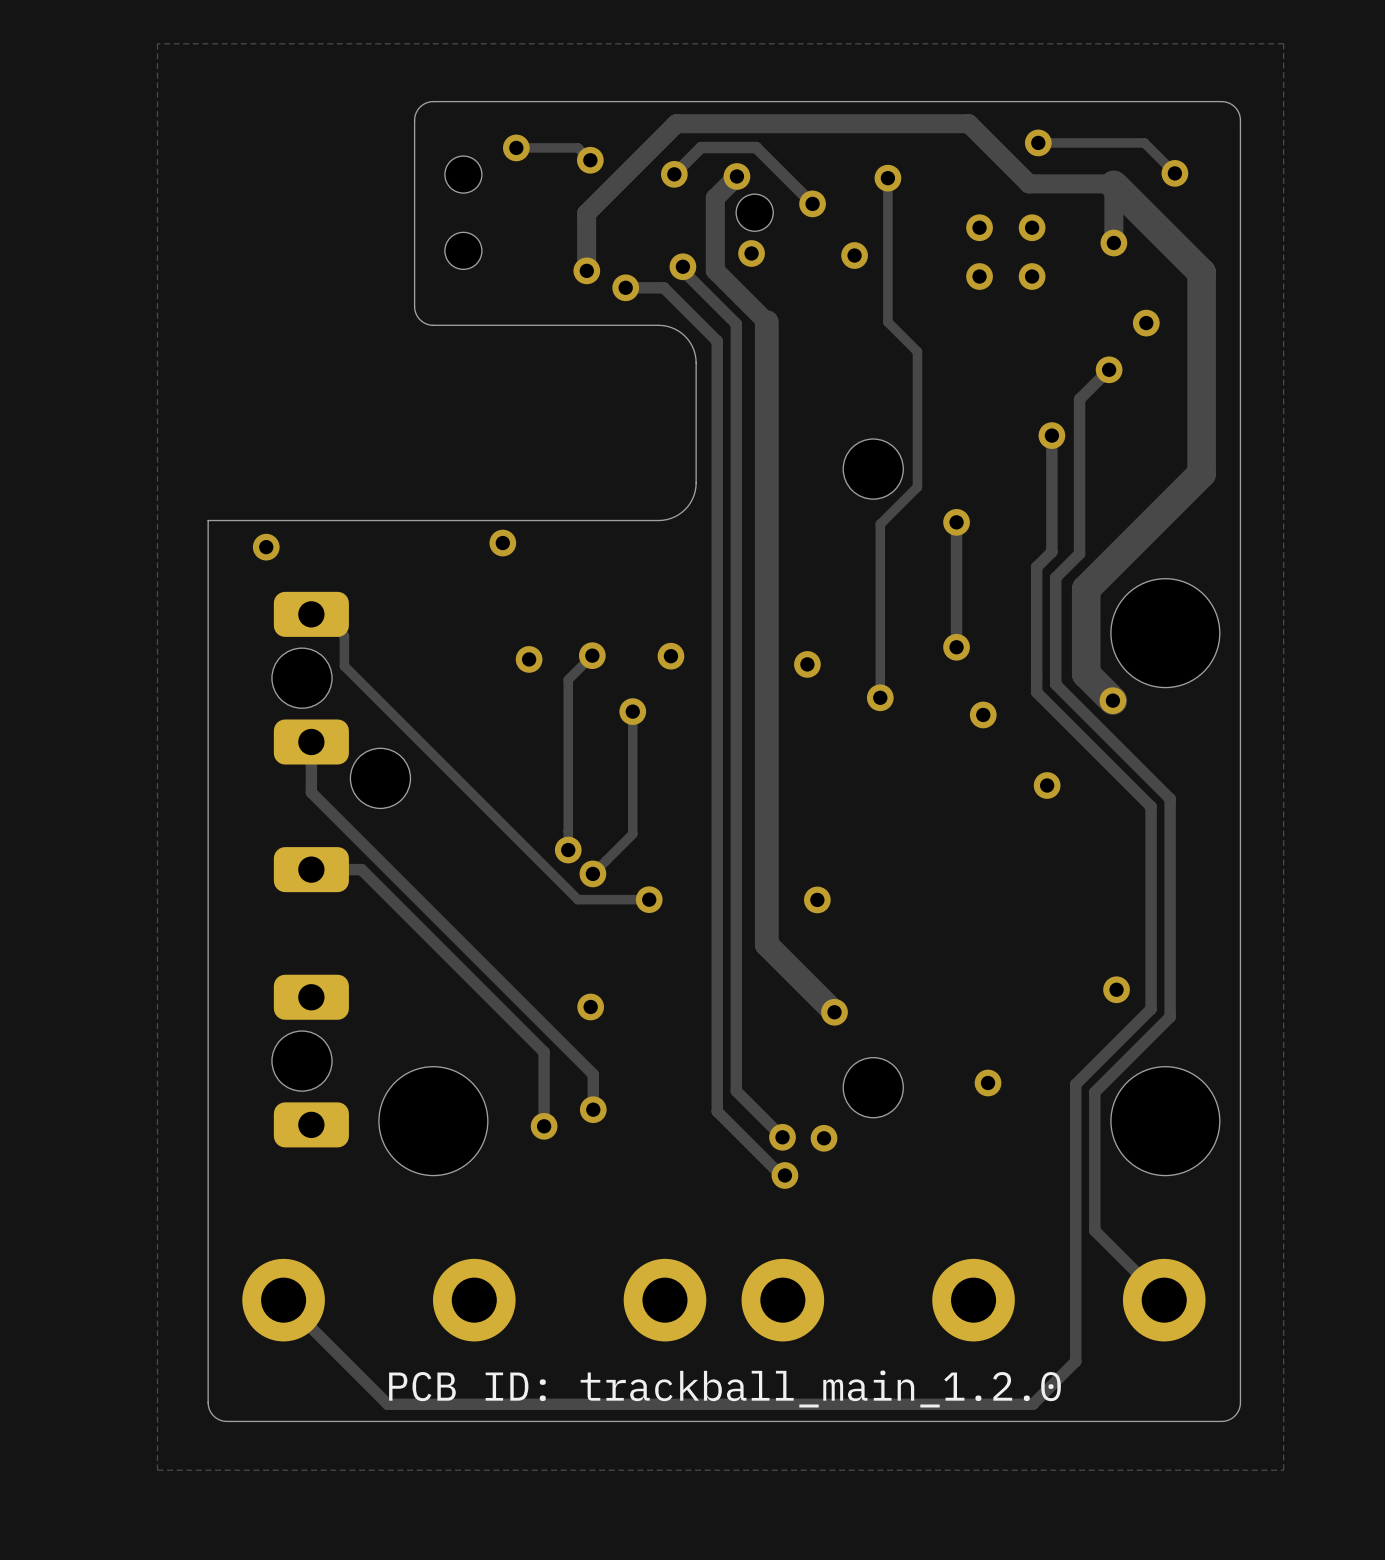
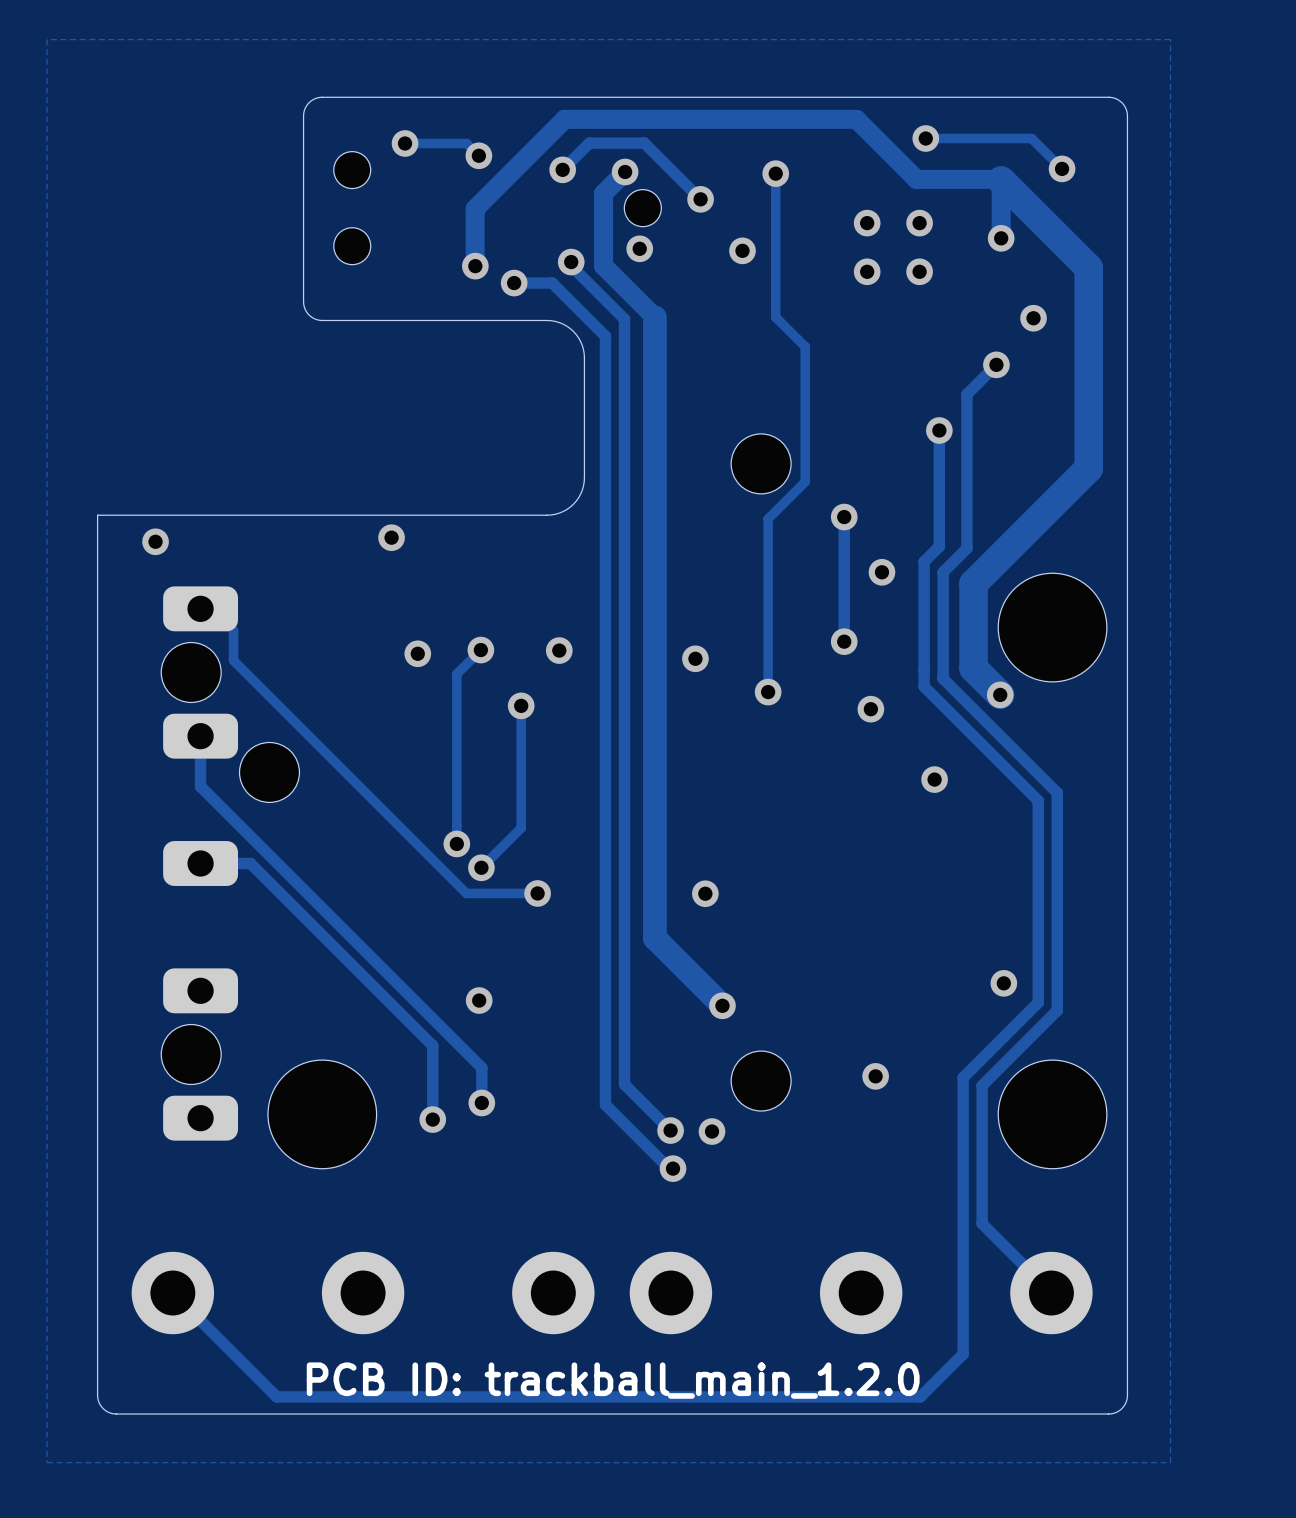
via: none -> (881, 572)

